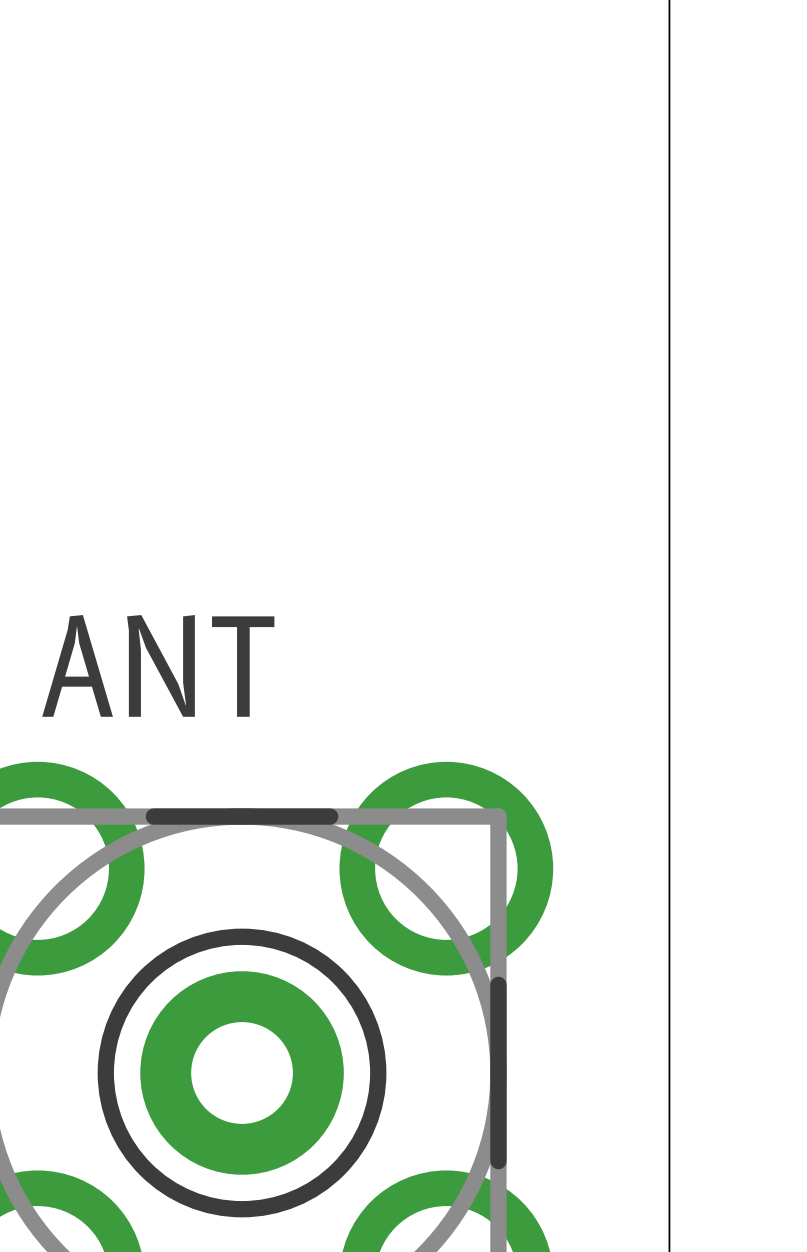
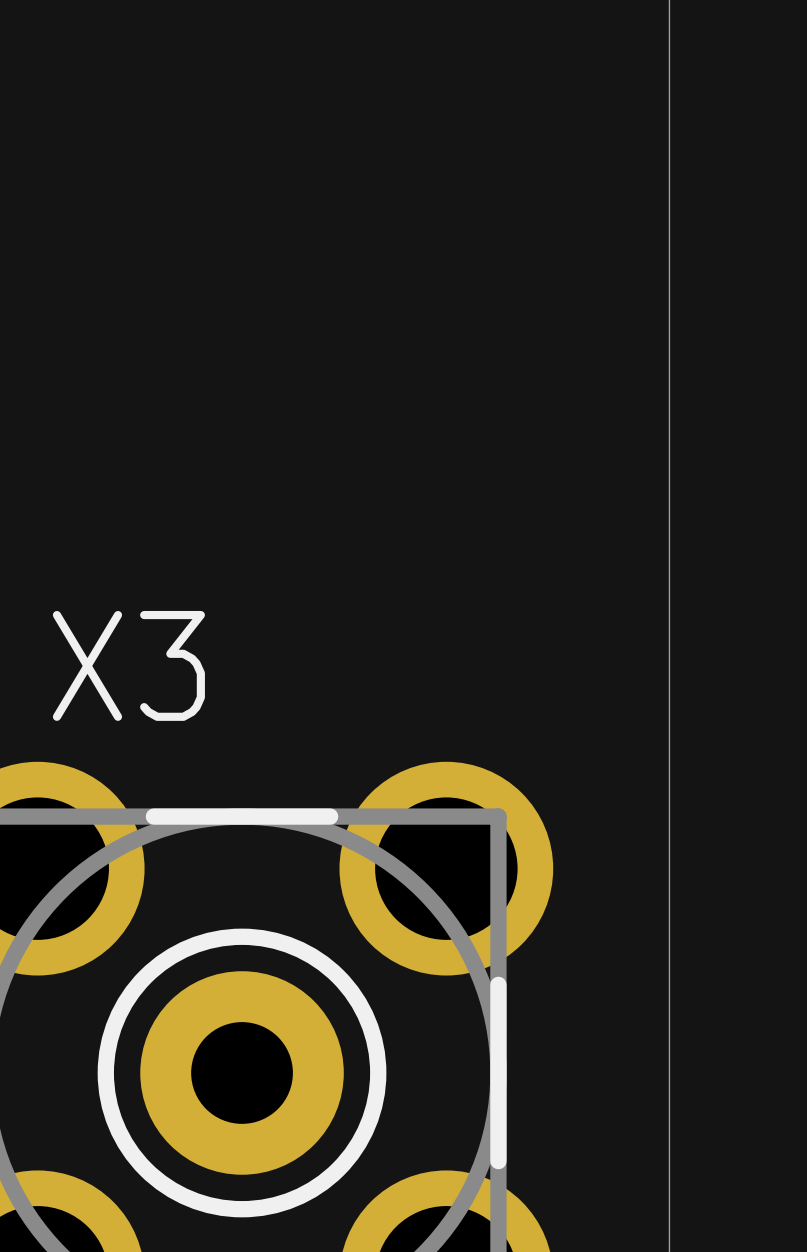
ANT name: ANT (158, 665) -> X3 (128, 665)

